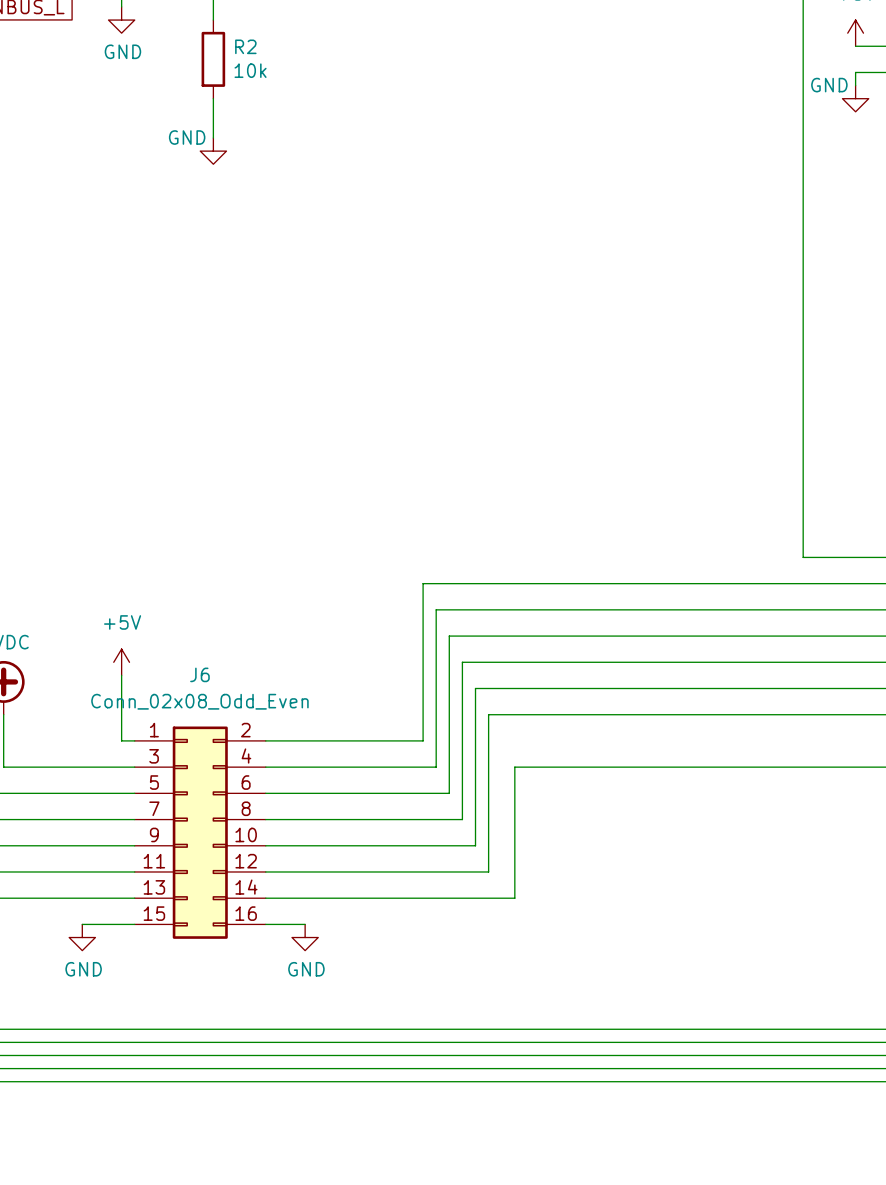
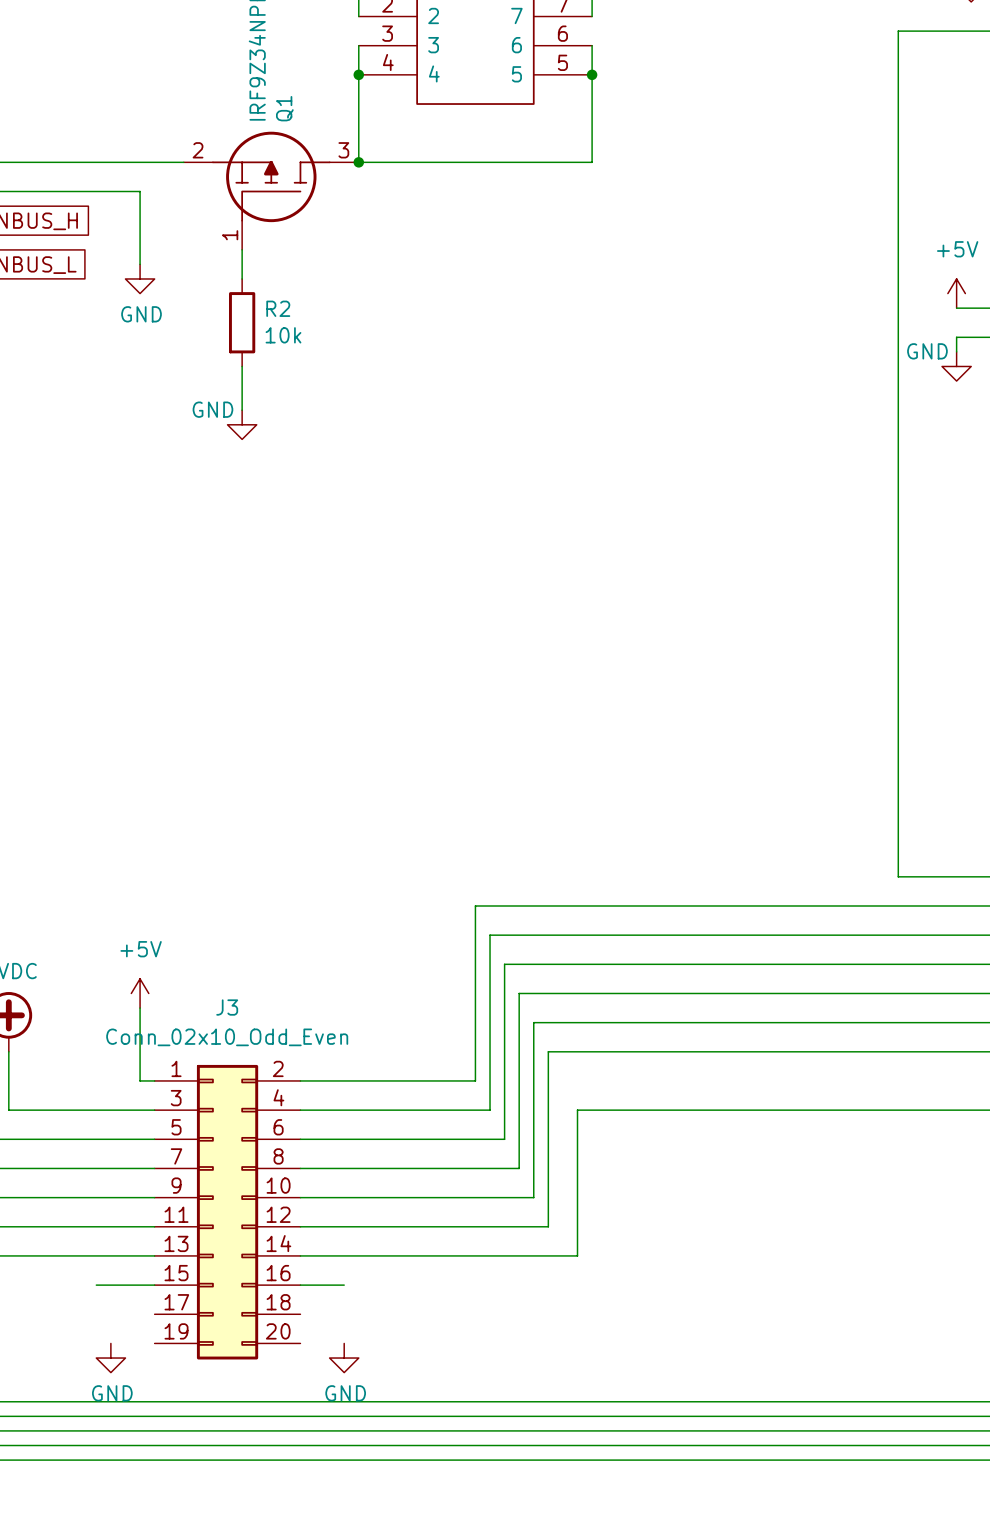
J6: Conn_02x08_Odd_Even (200, 832) -> none
J3: none -> Conn_02x10_Odd_Even (227, 1212)
power symbol position: GND (82, 937) -> GND (110, 1358)
power symbol position: GND (305, 937) -> GND (344, 1358)

